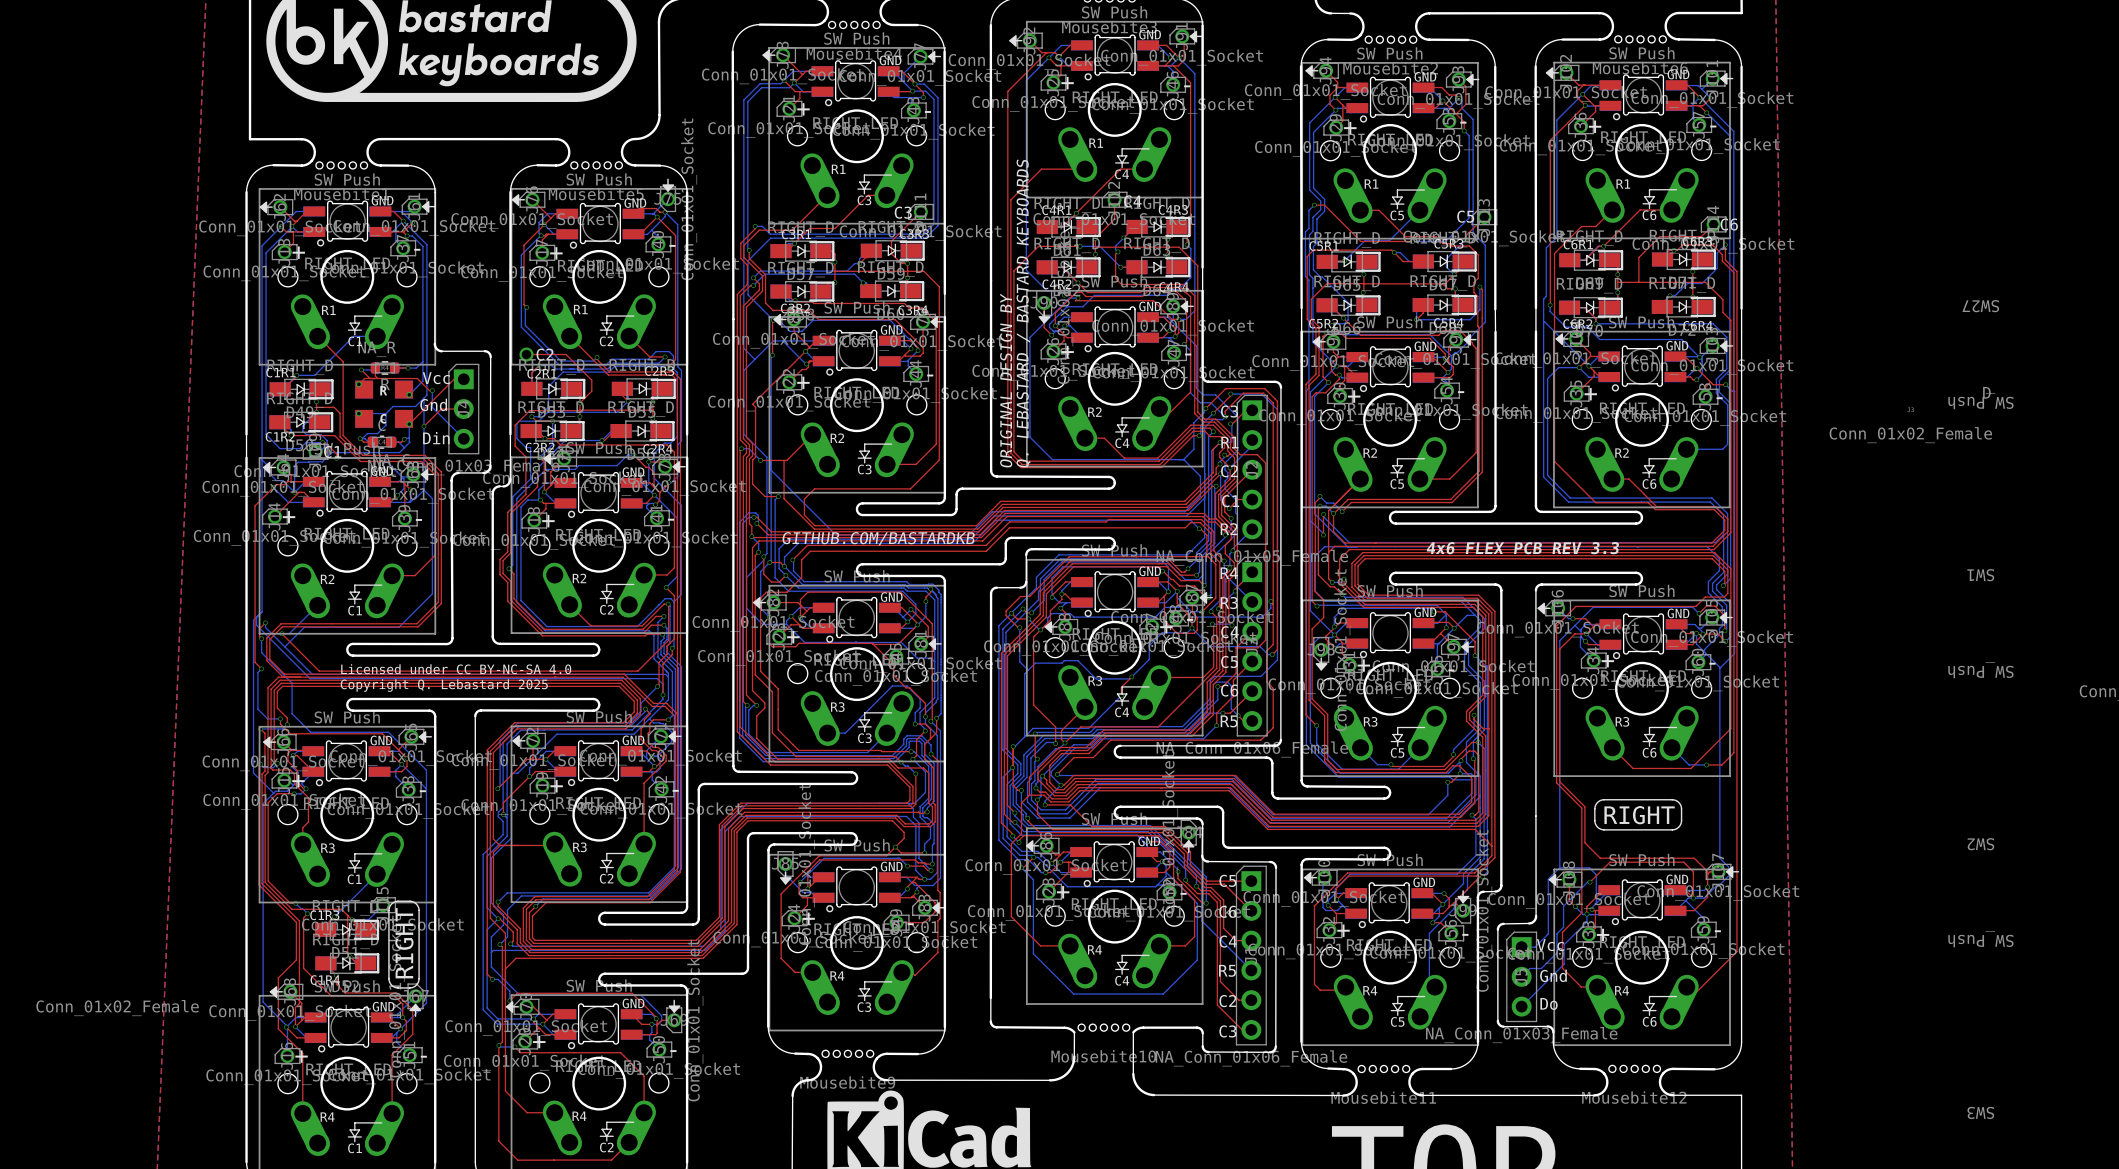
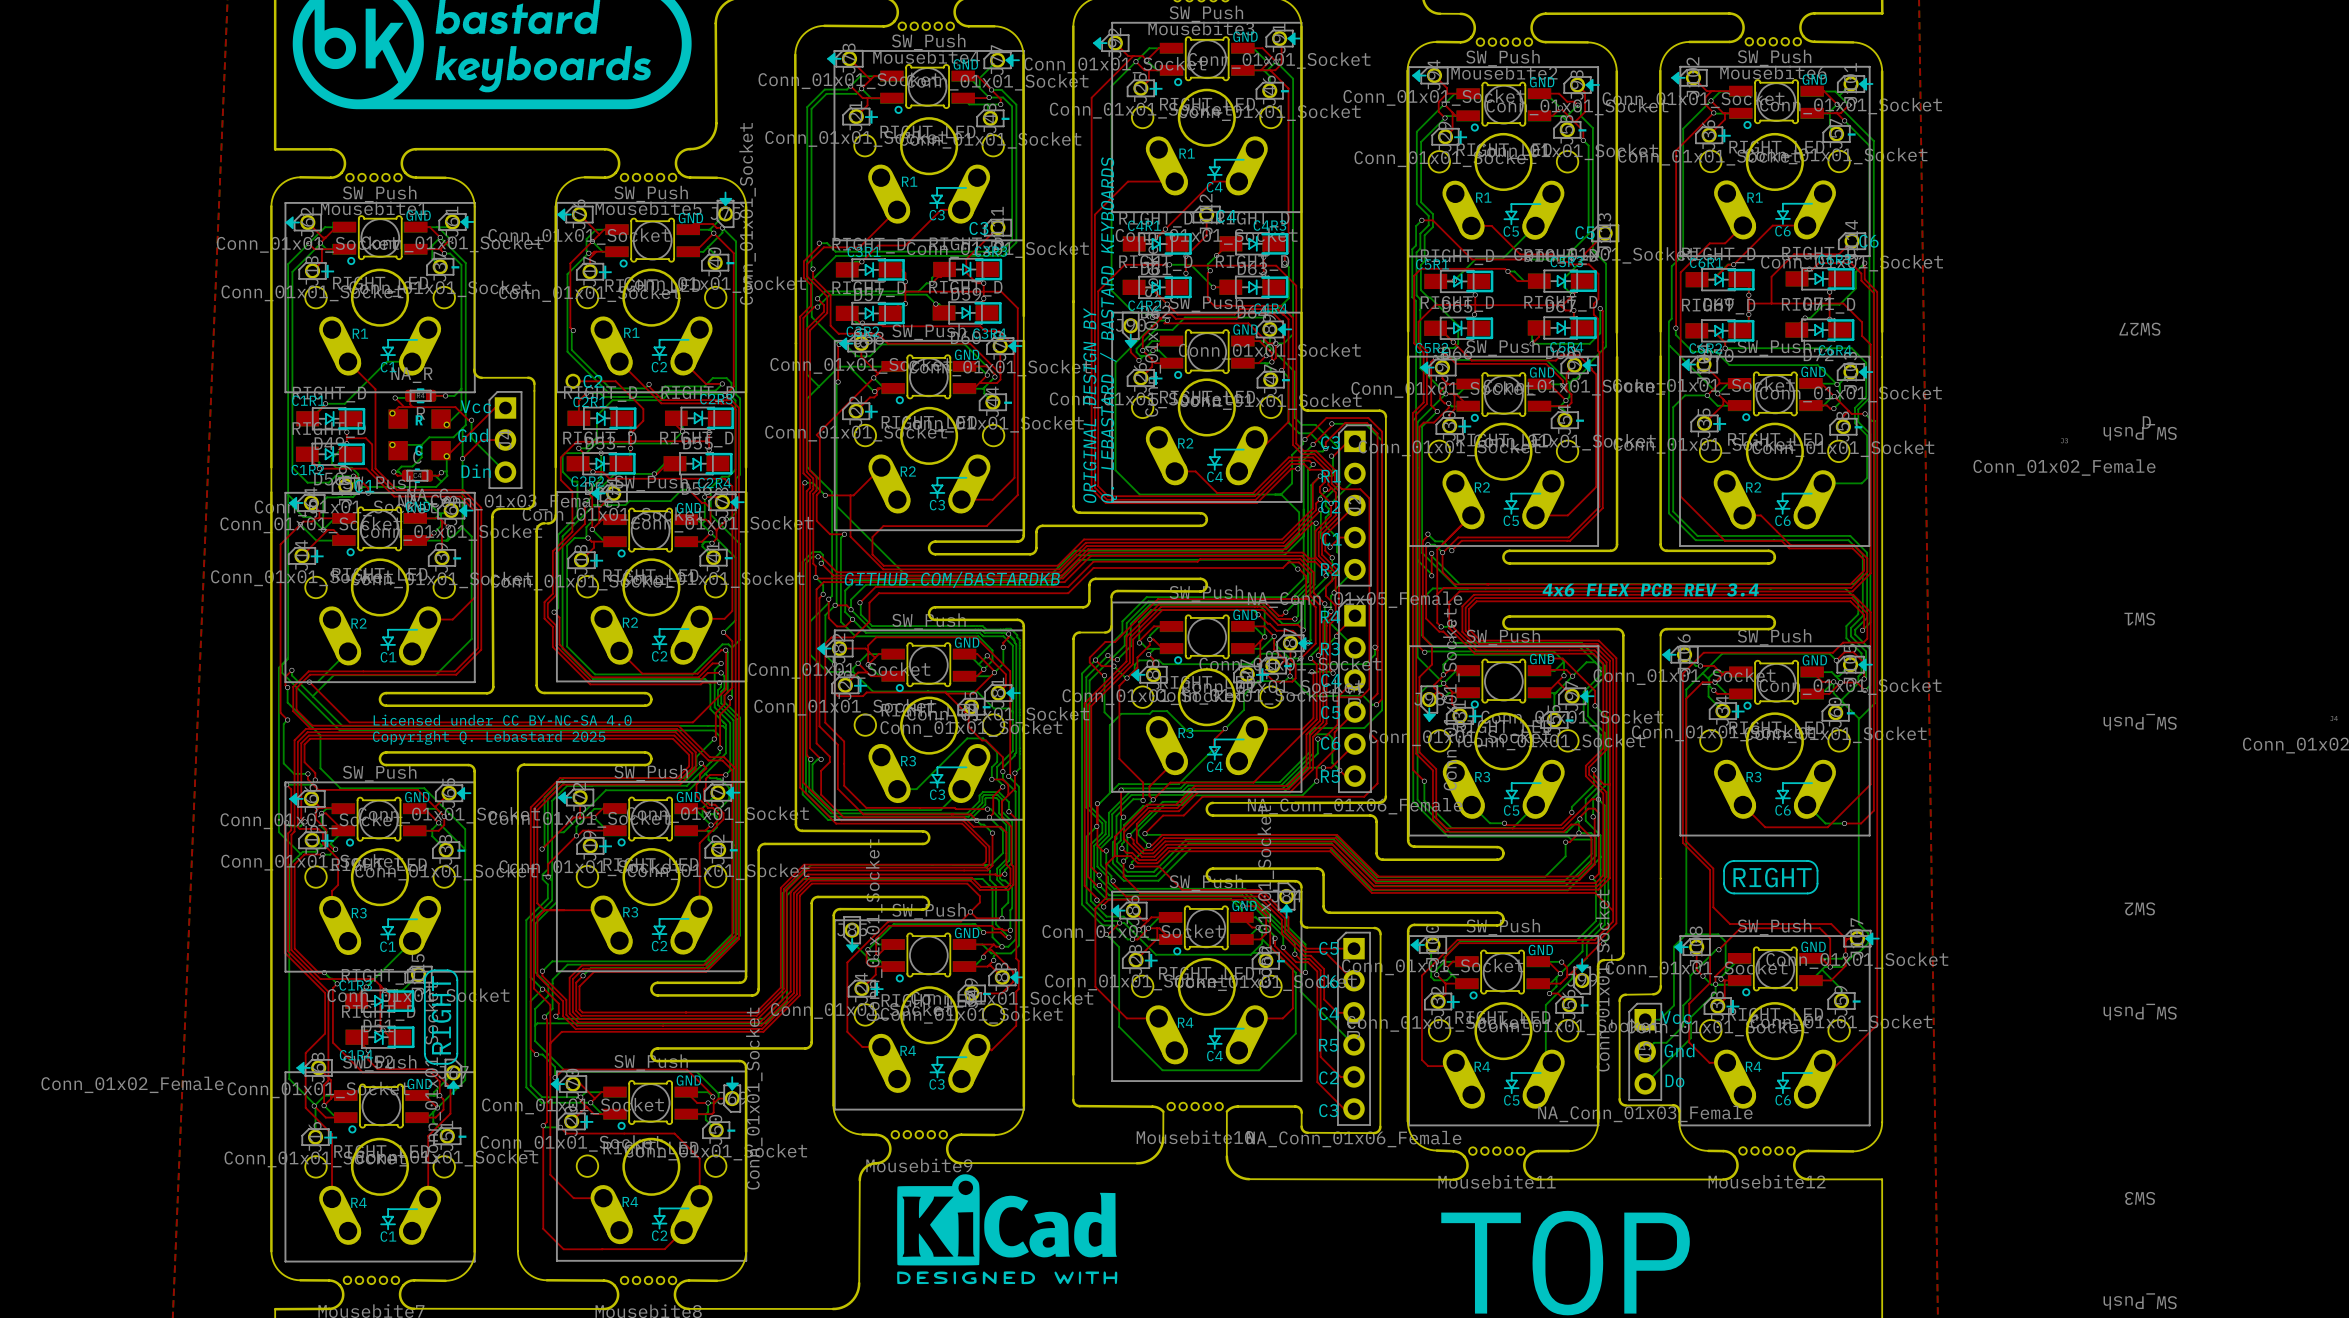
text: 4x6 FLEX PCB REV 3.3 (1522, 548) -> 4x6 FLEX PCB REV 3.4 (1650, 589)

